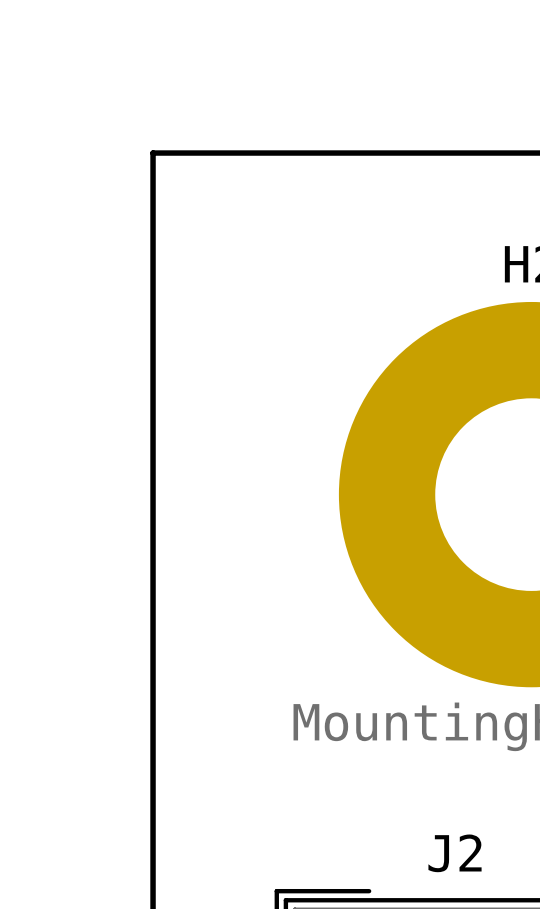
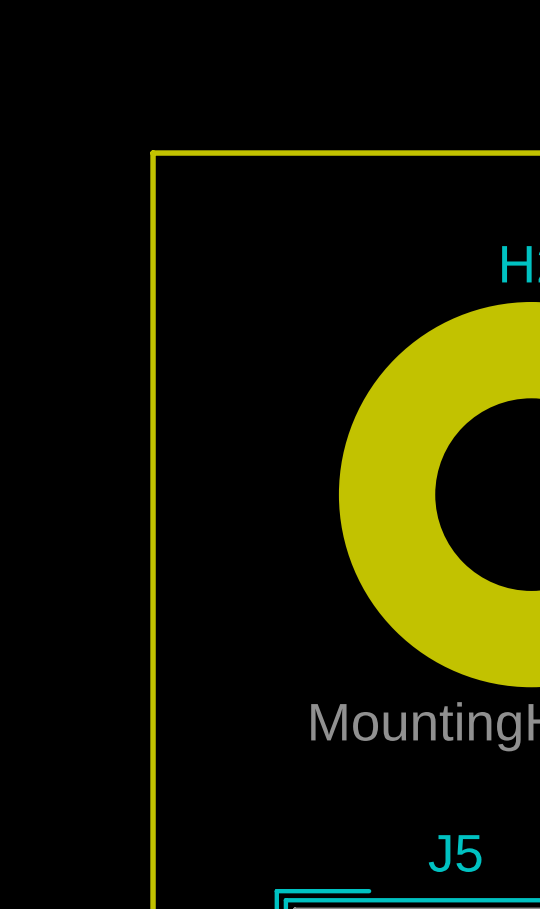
J2 name: J2 (455, 853) -> J5 (455, 853)

